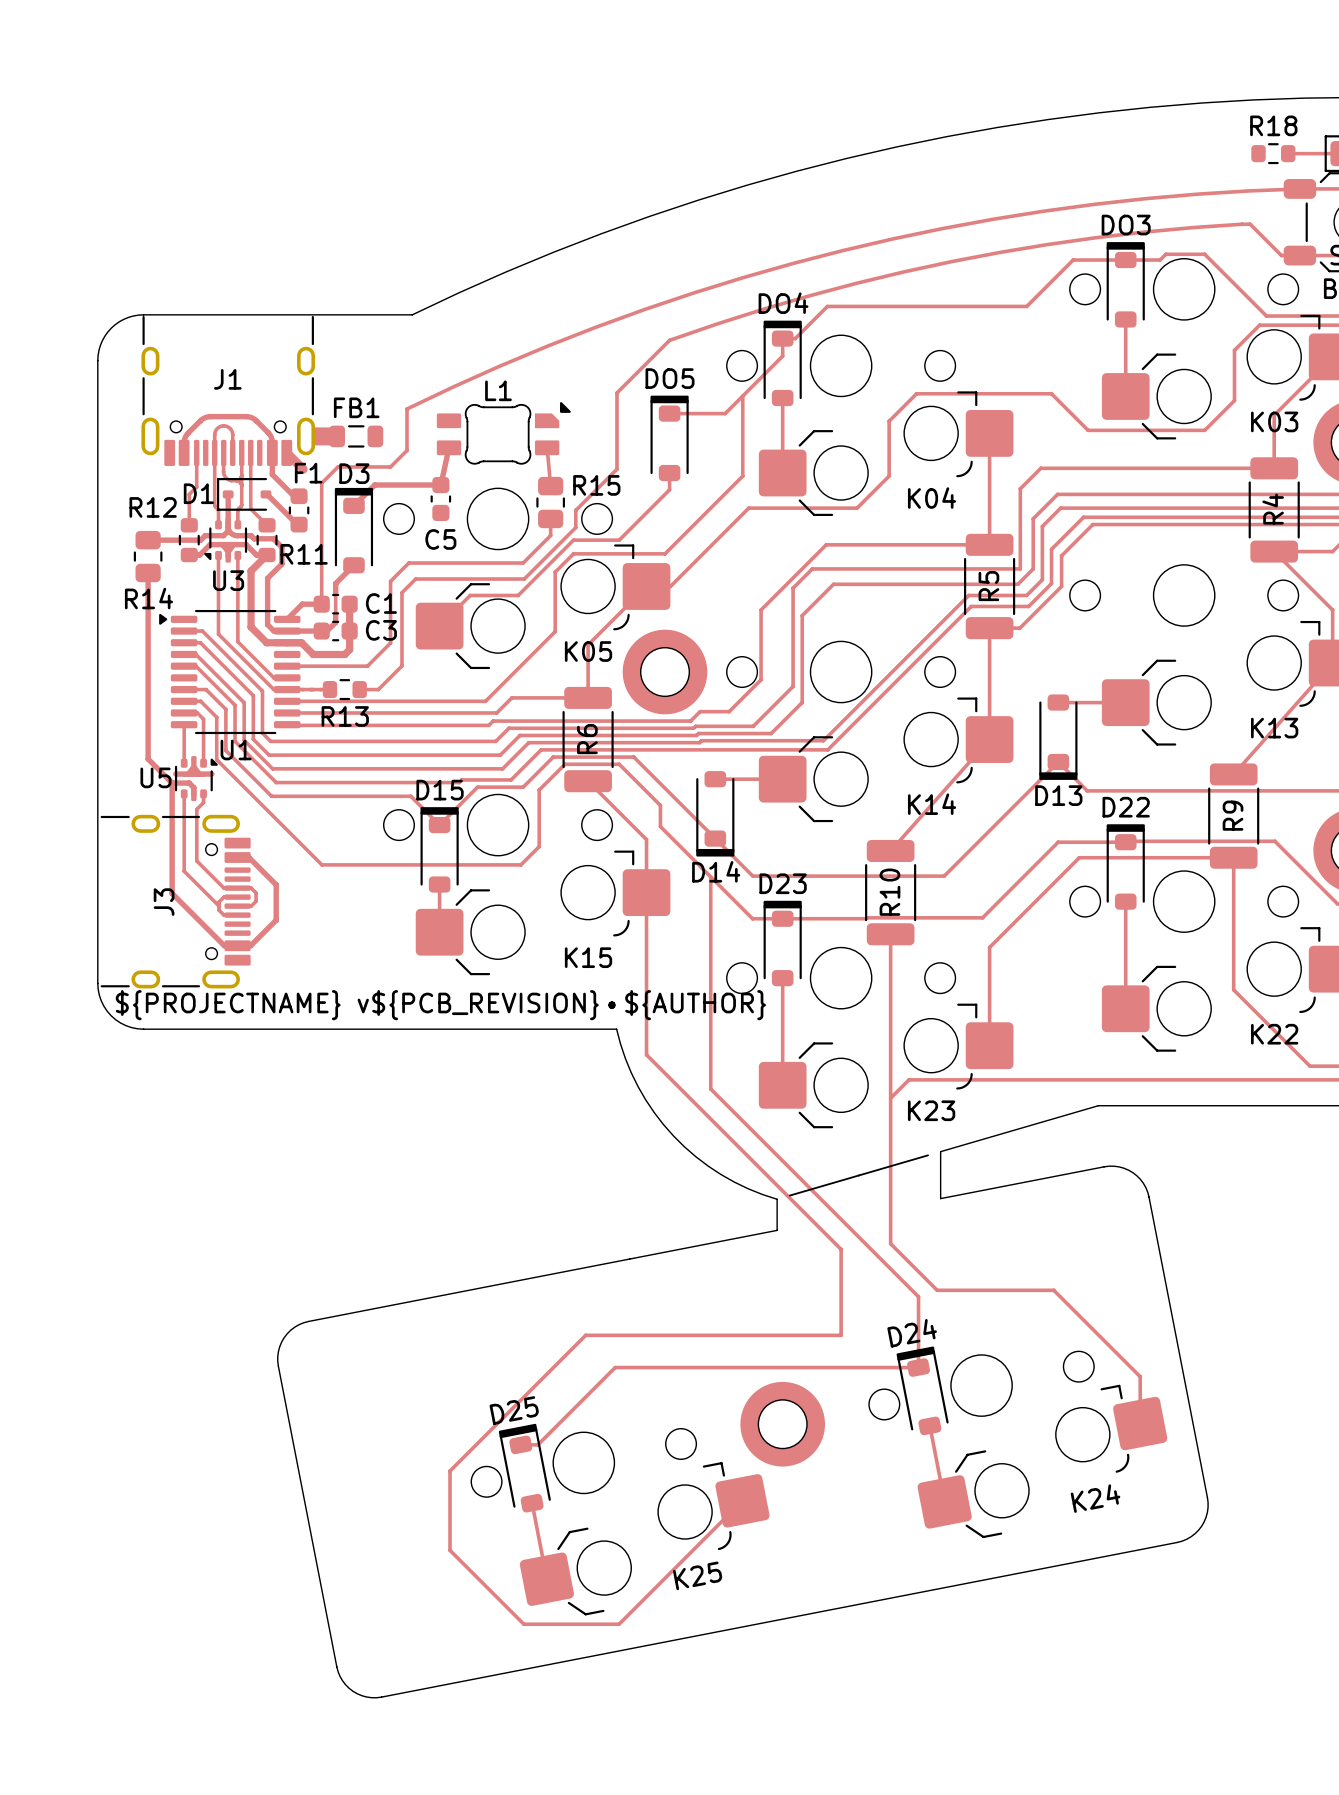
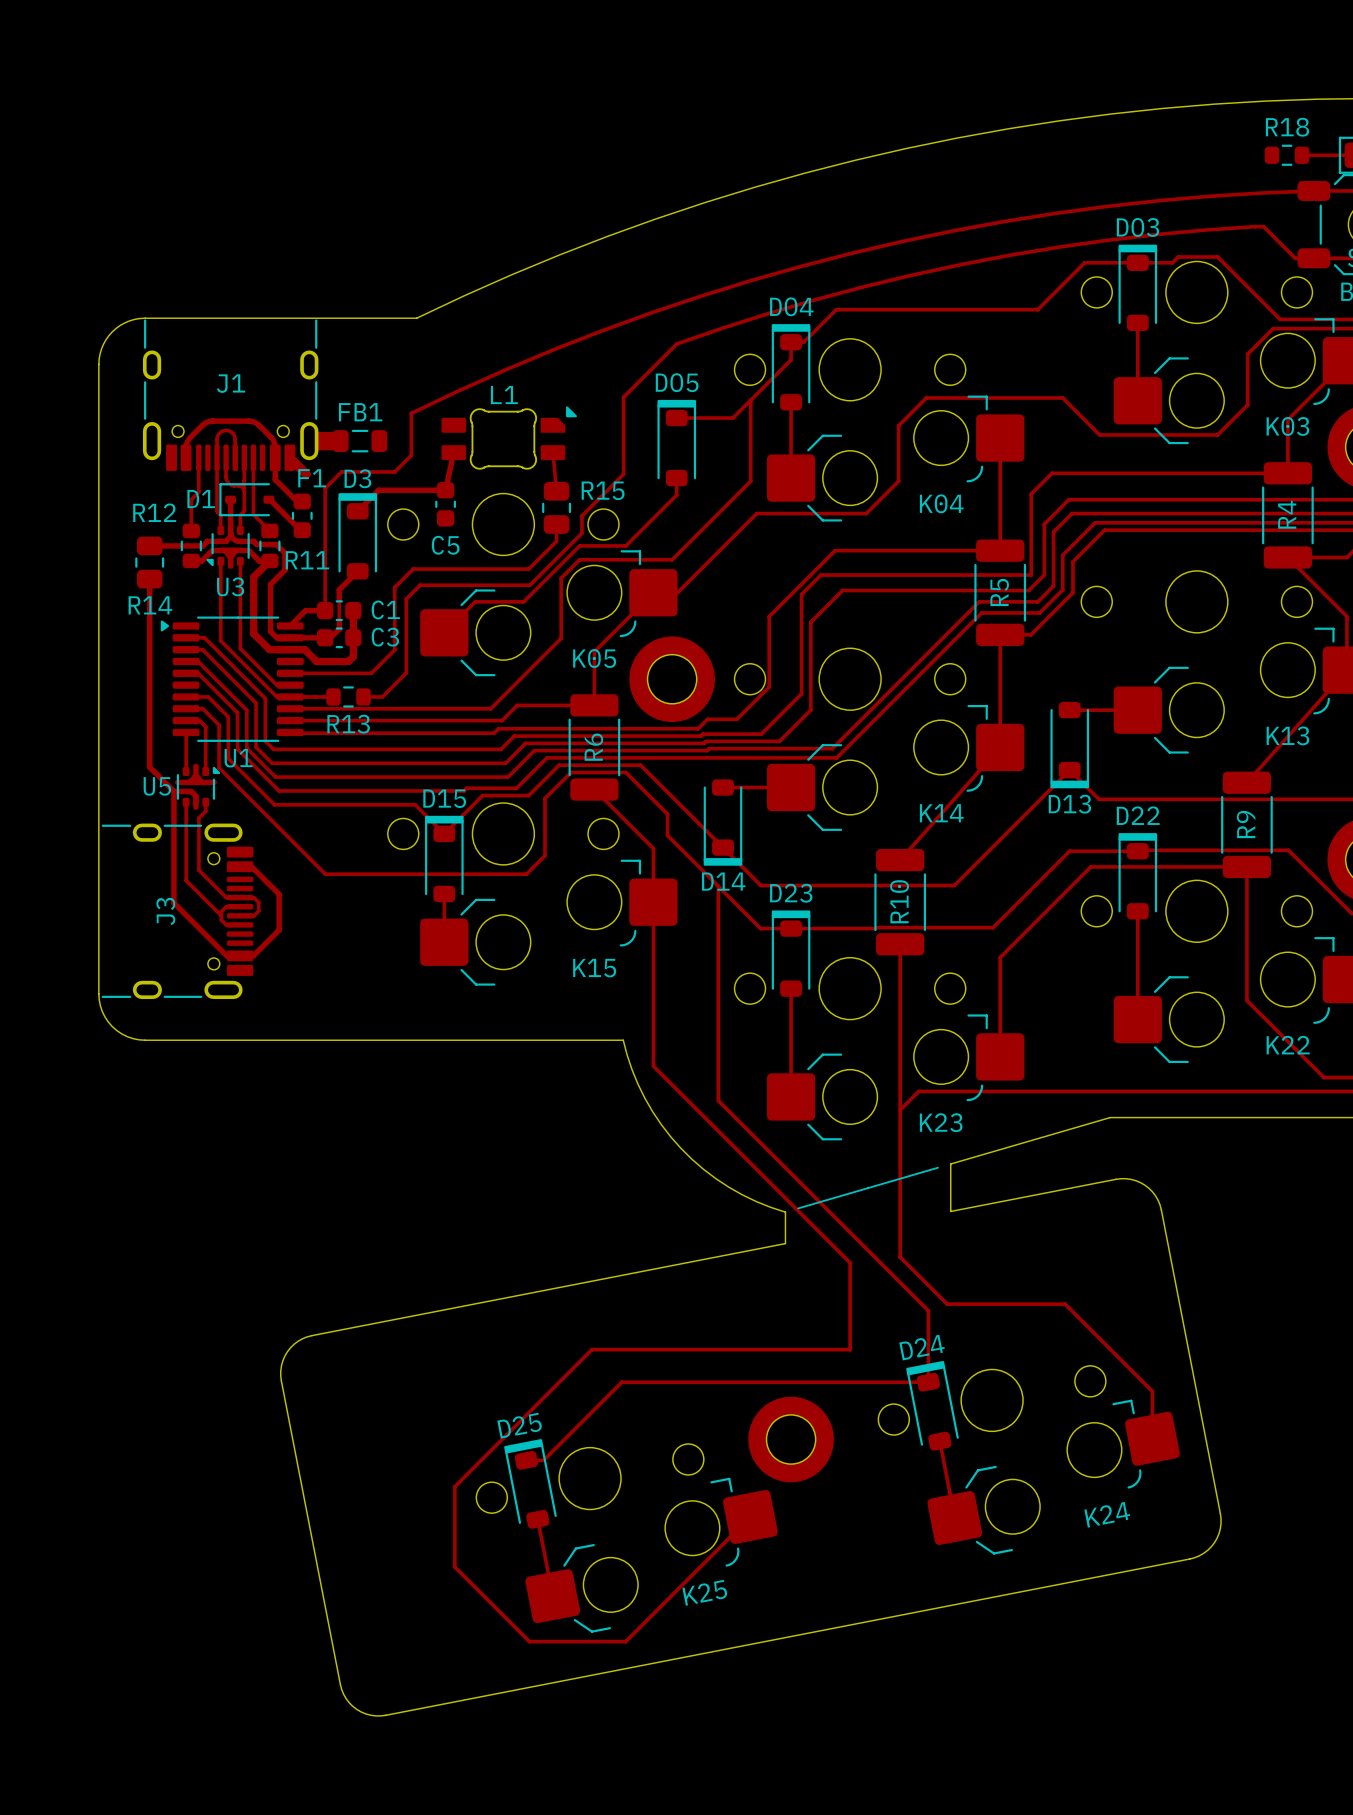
text: ${PROJECTNAME} v${PCB_REVISION}•${AUTHOR} (440, 1005) -> none

